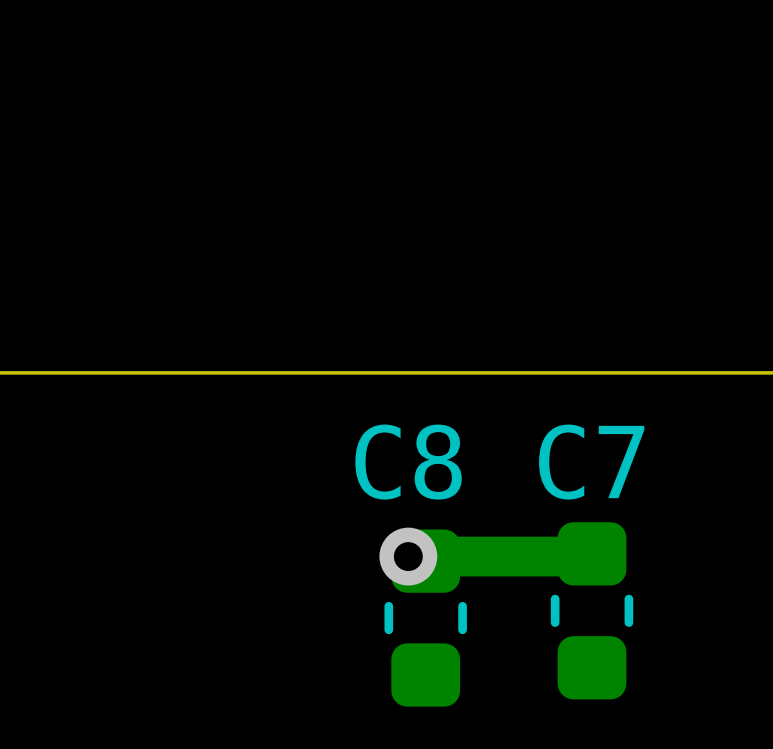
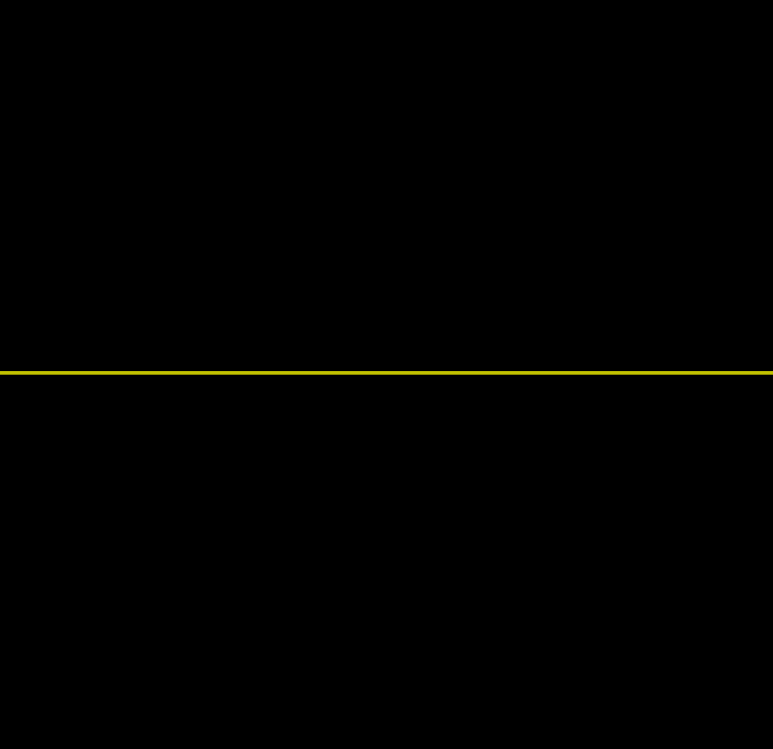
via: (408, 556) -> none
track: (602, 556) (408, 556) -> none
C7: (592, 610) -> none
C8: (425, 618) -> none

